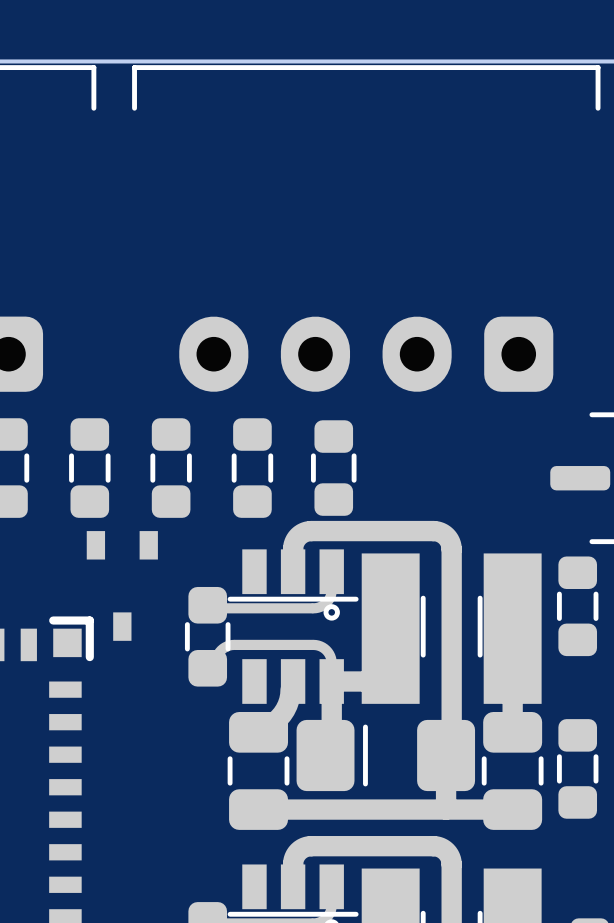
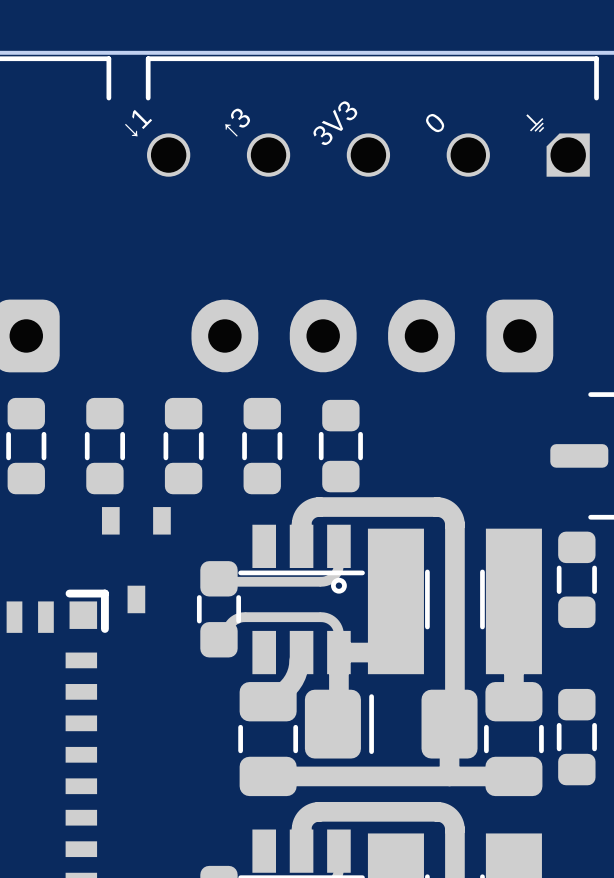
part: none -> (368, 155)

